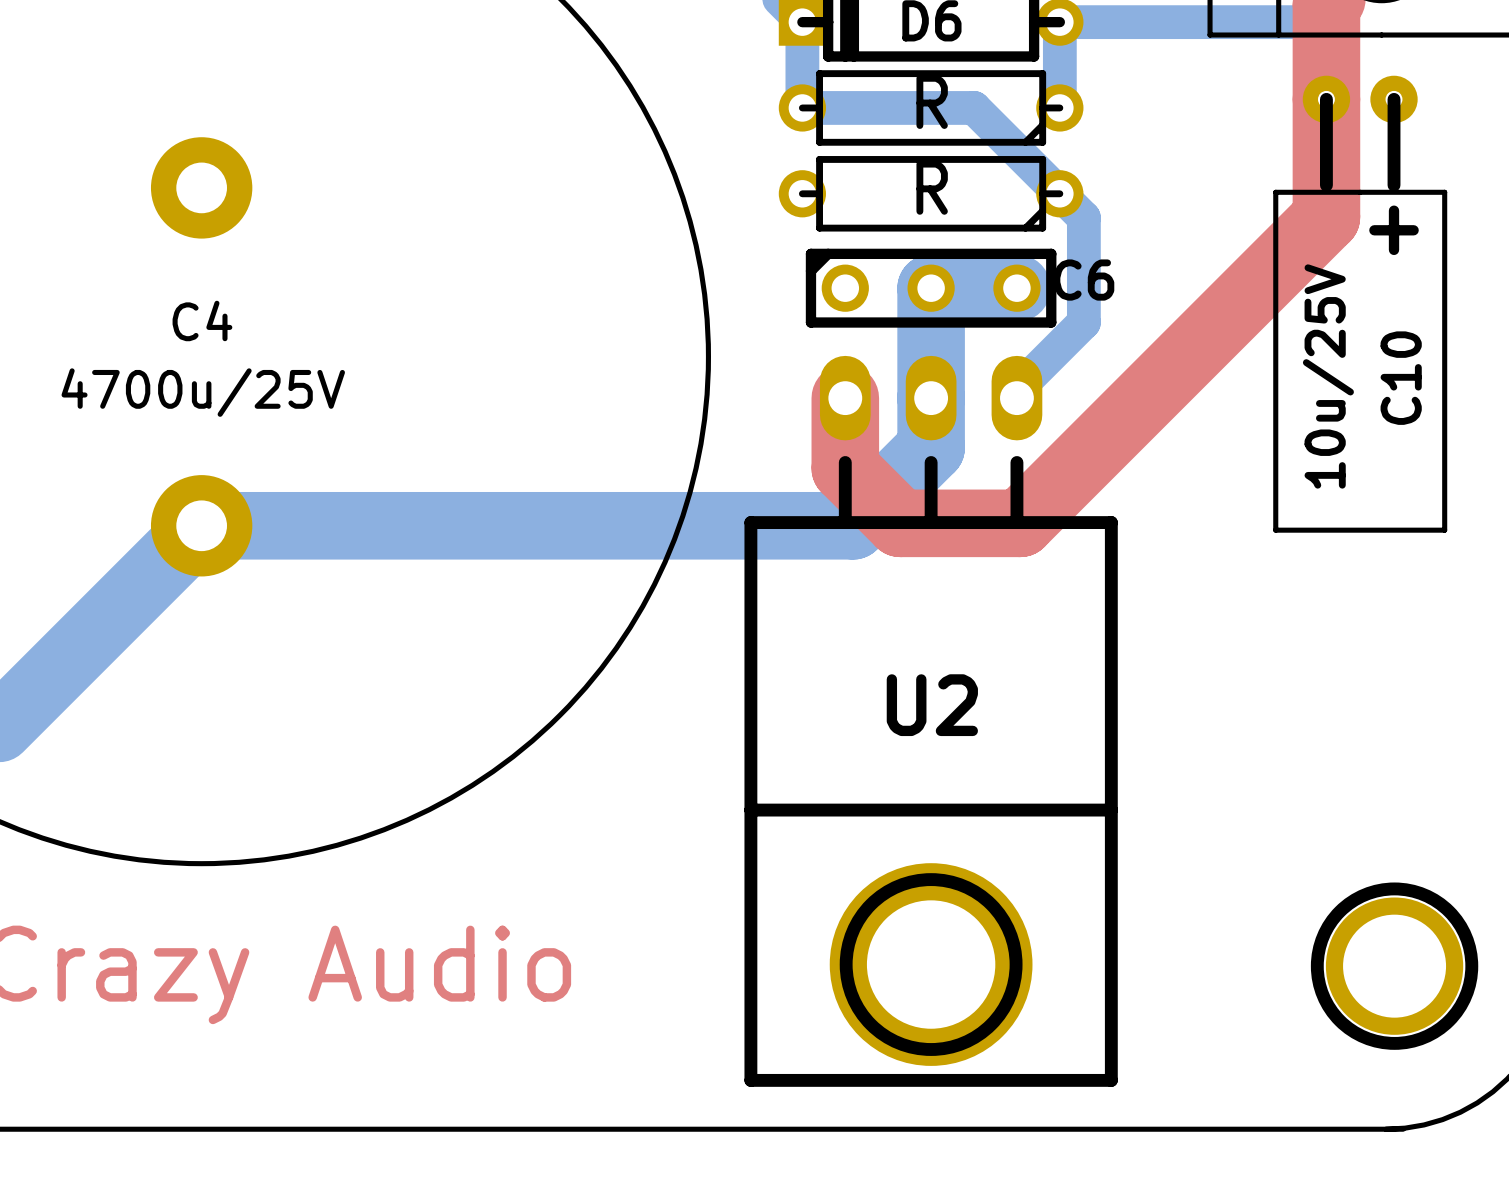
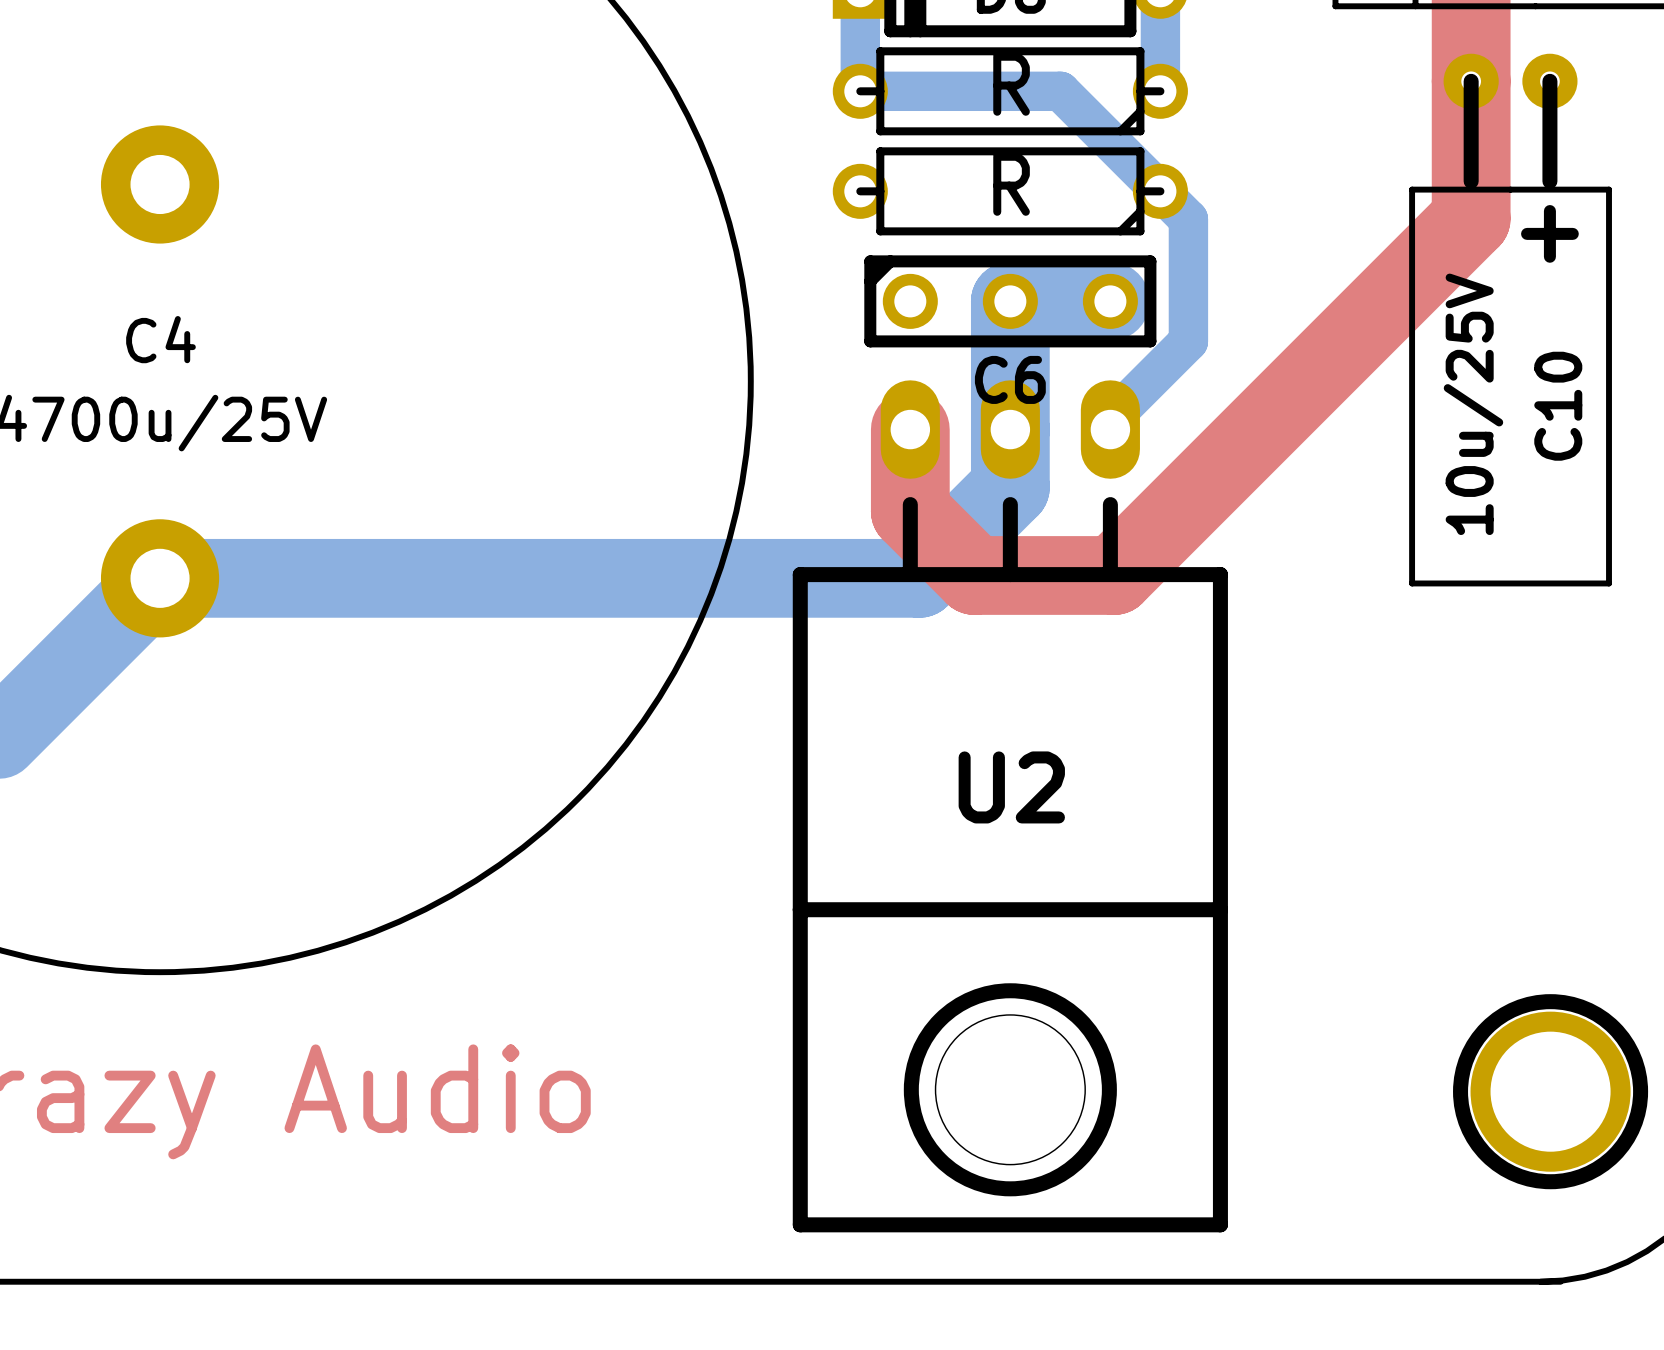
C6 name position: C6 (1083, 280) -> C6 (1010, 379)
U2 footprint: [744, 355, 1118, 1087] -> [792, 380, 1228, 1233]

